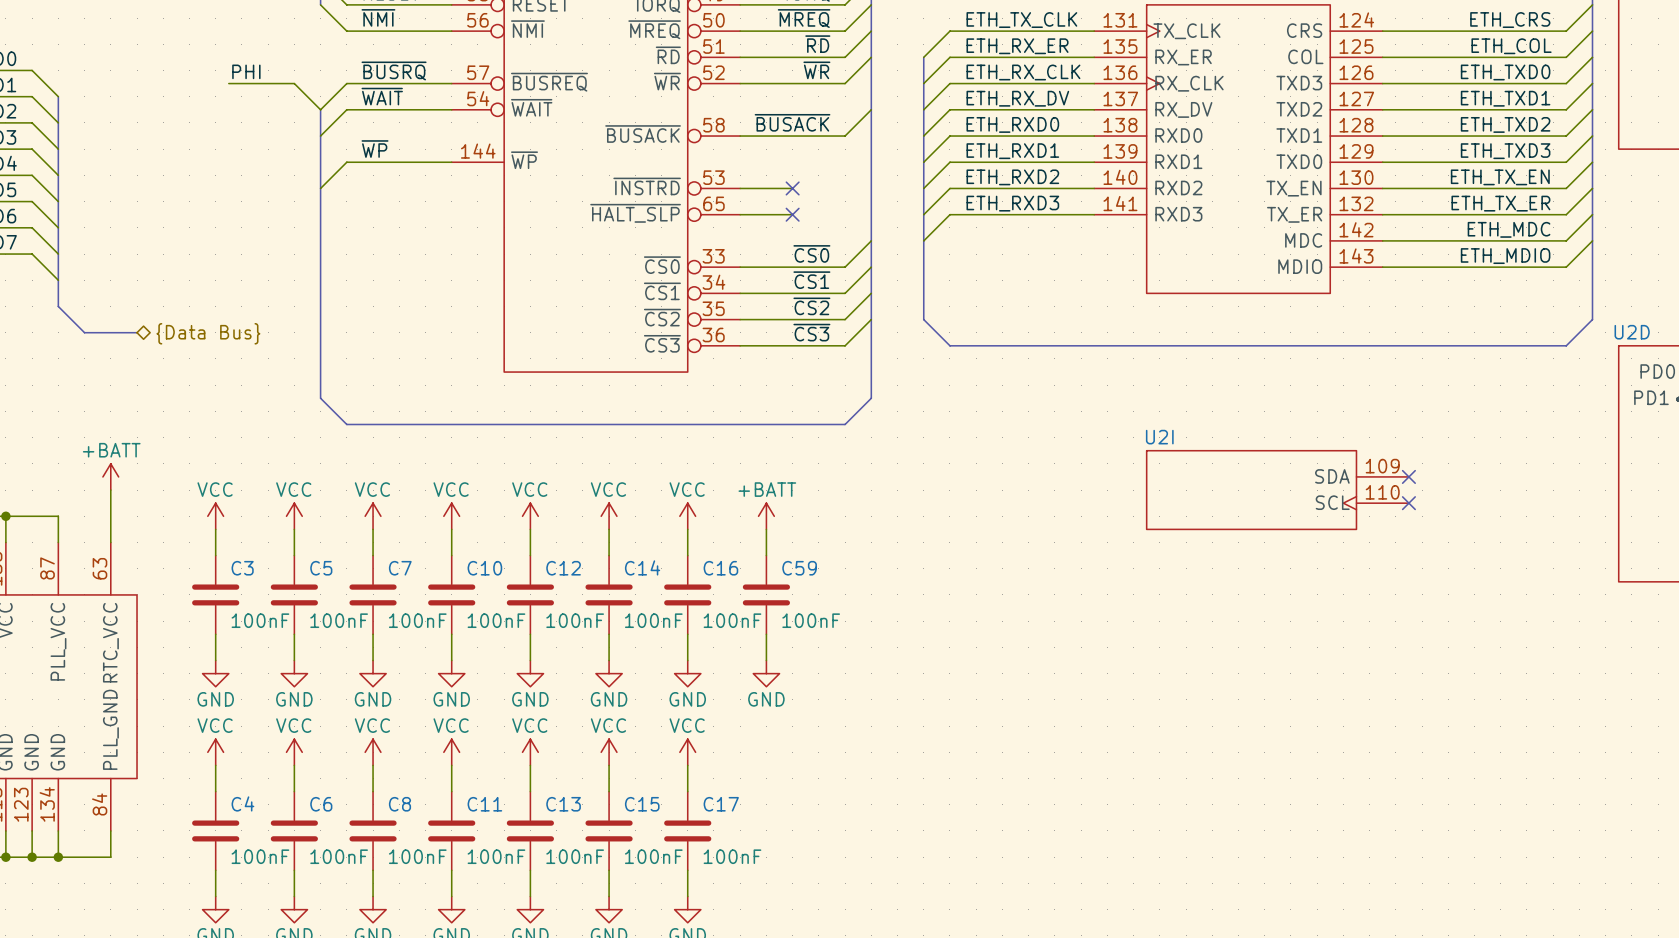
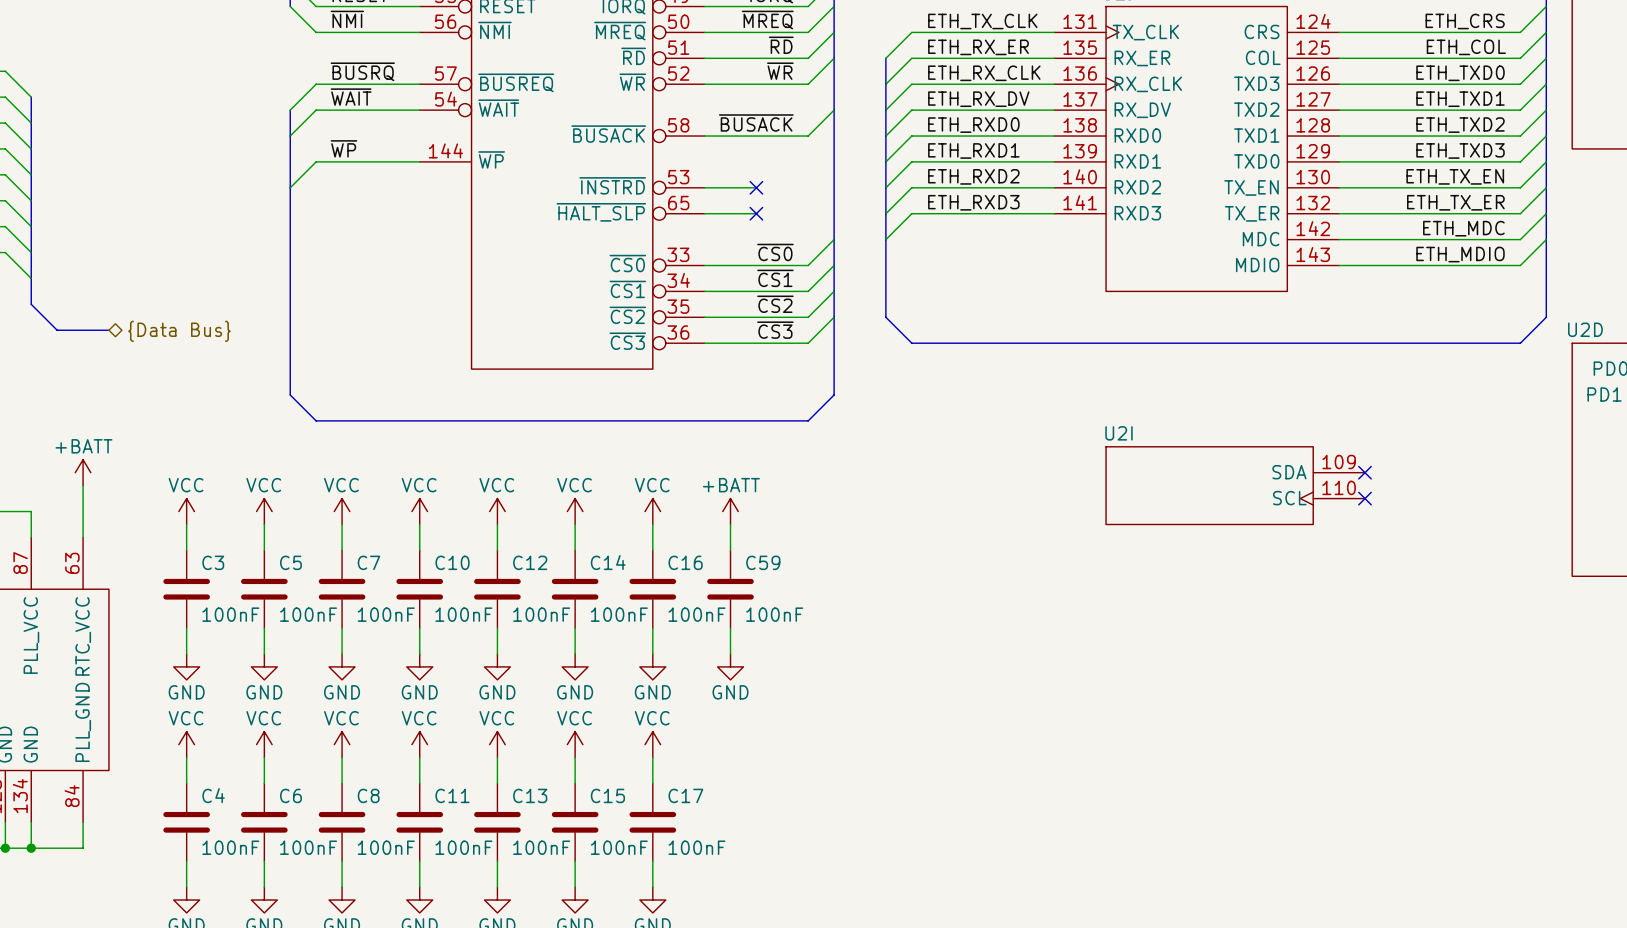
label: PHI (246, 71) -> none
wire: (228, 83) (294, 83) (320, 109) -> none

